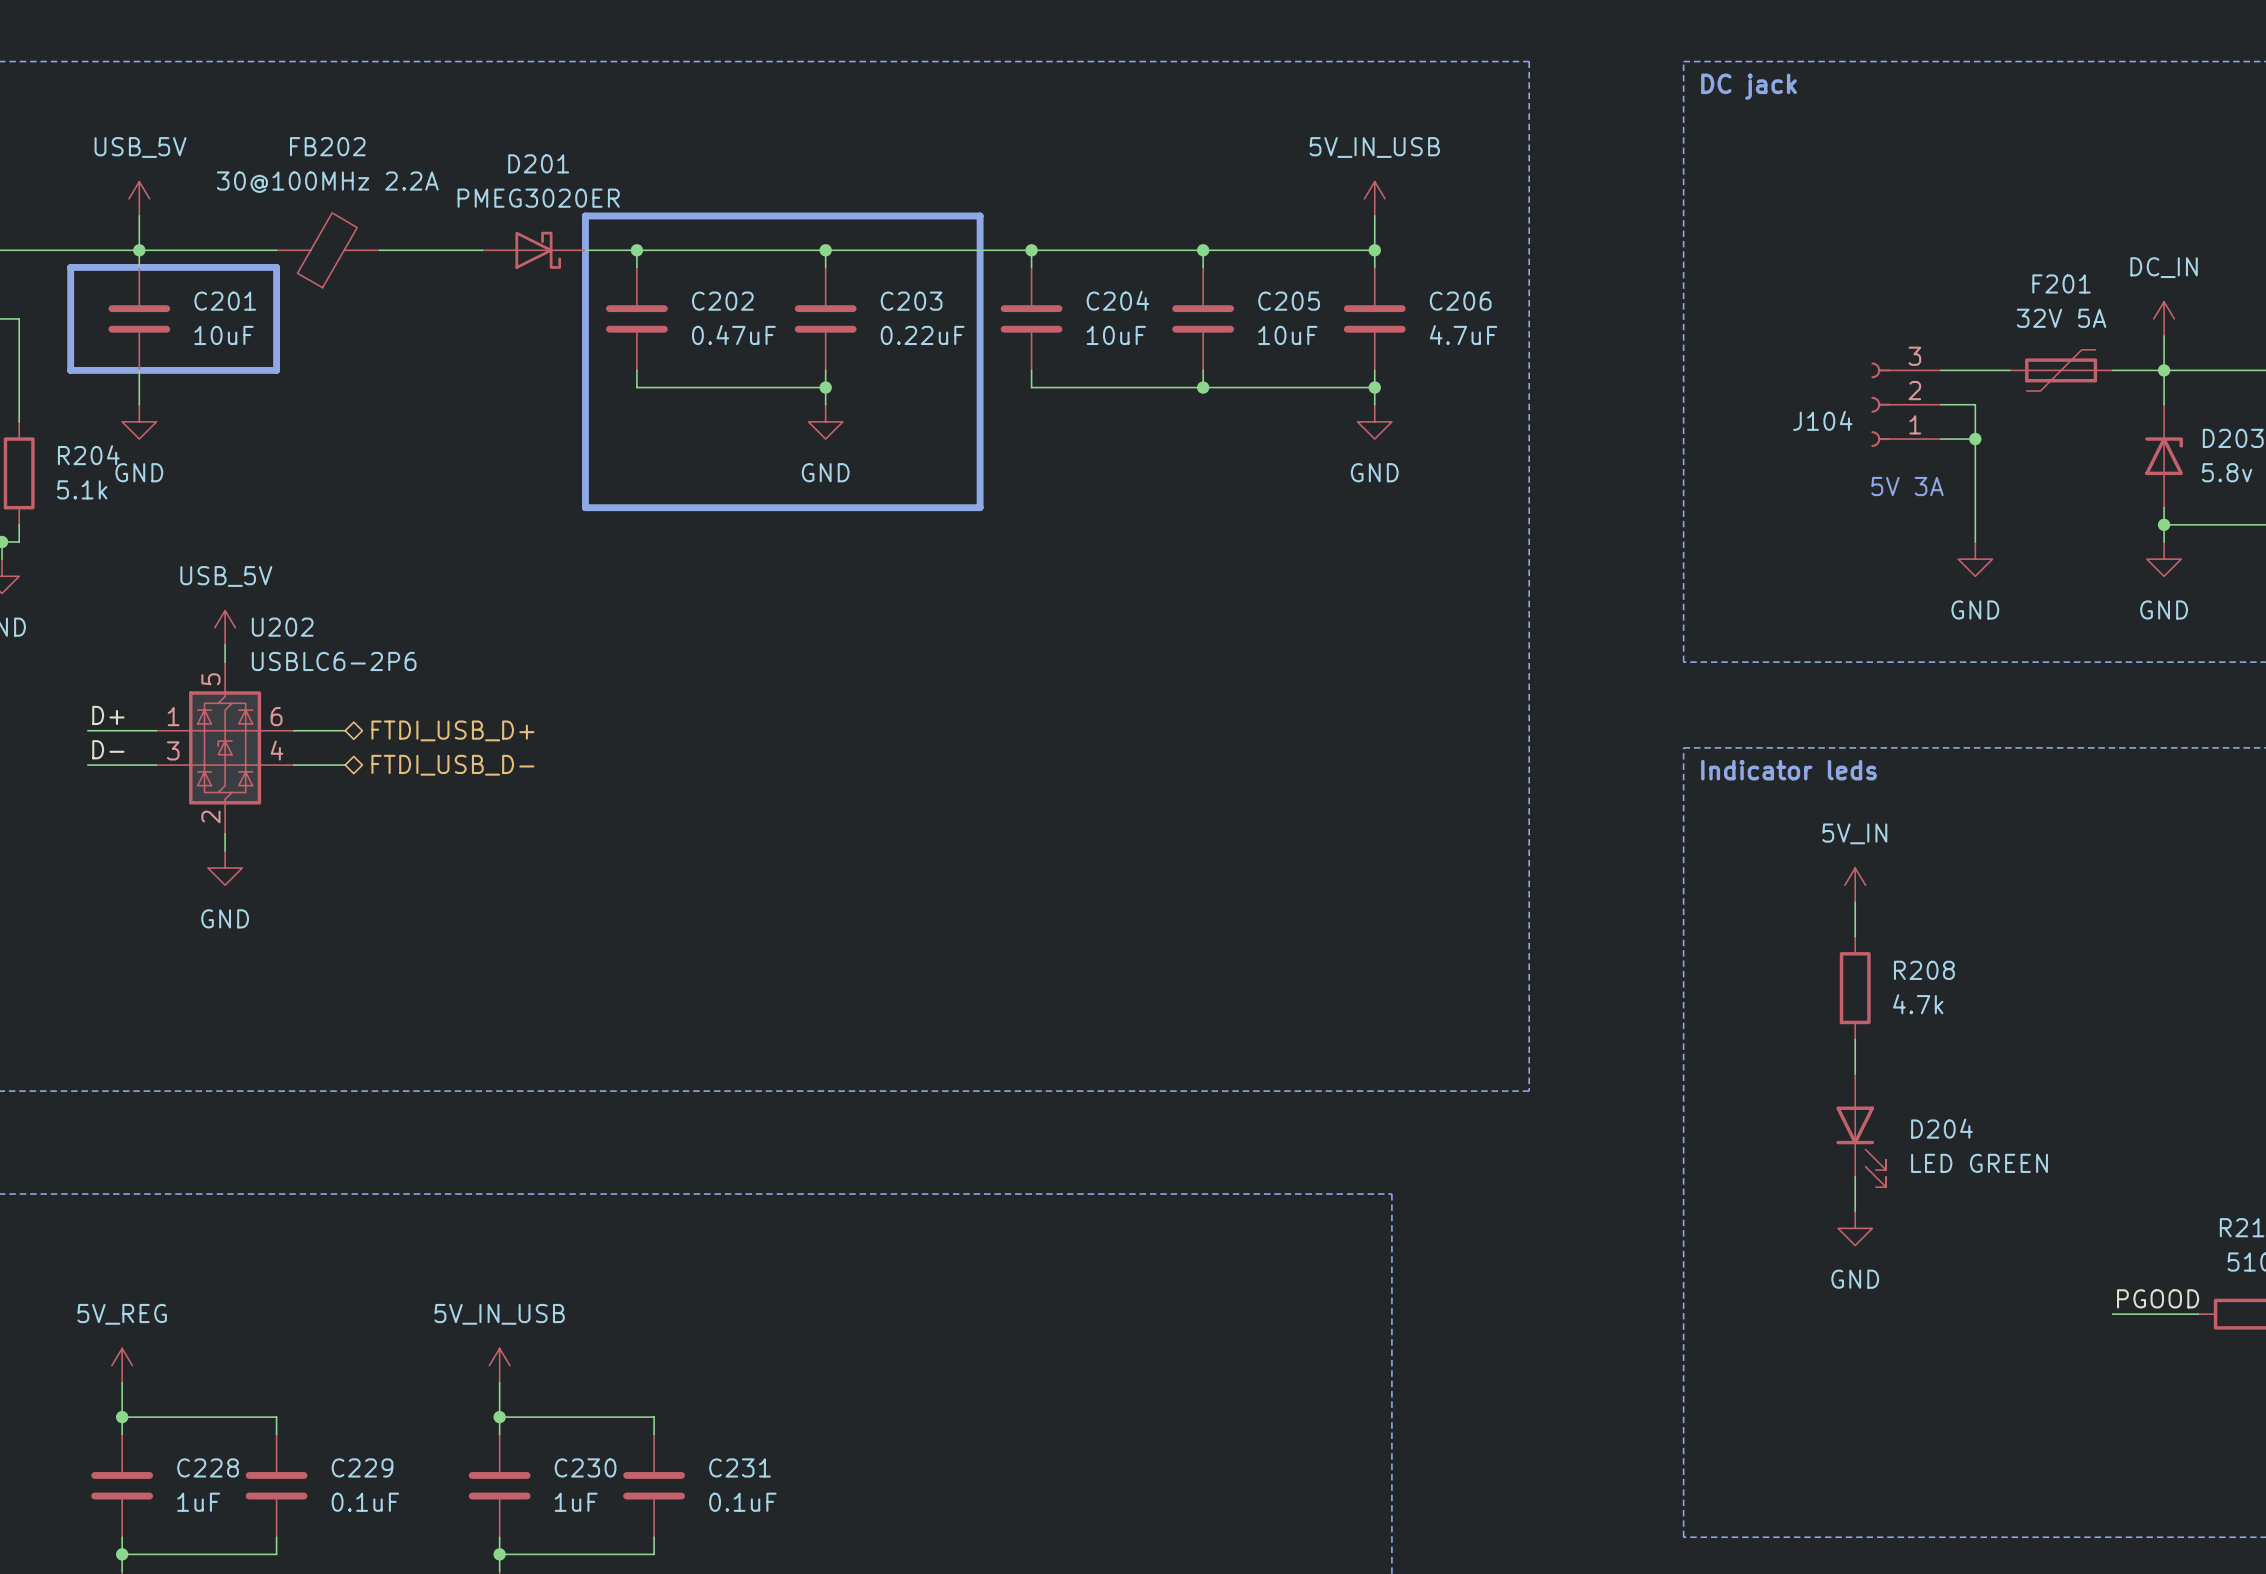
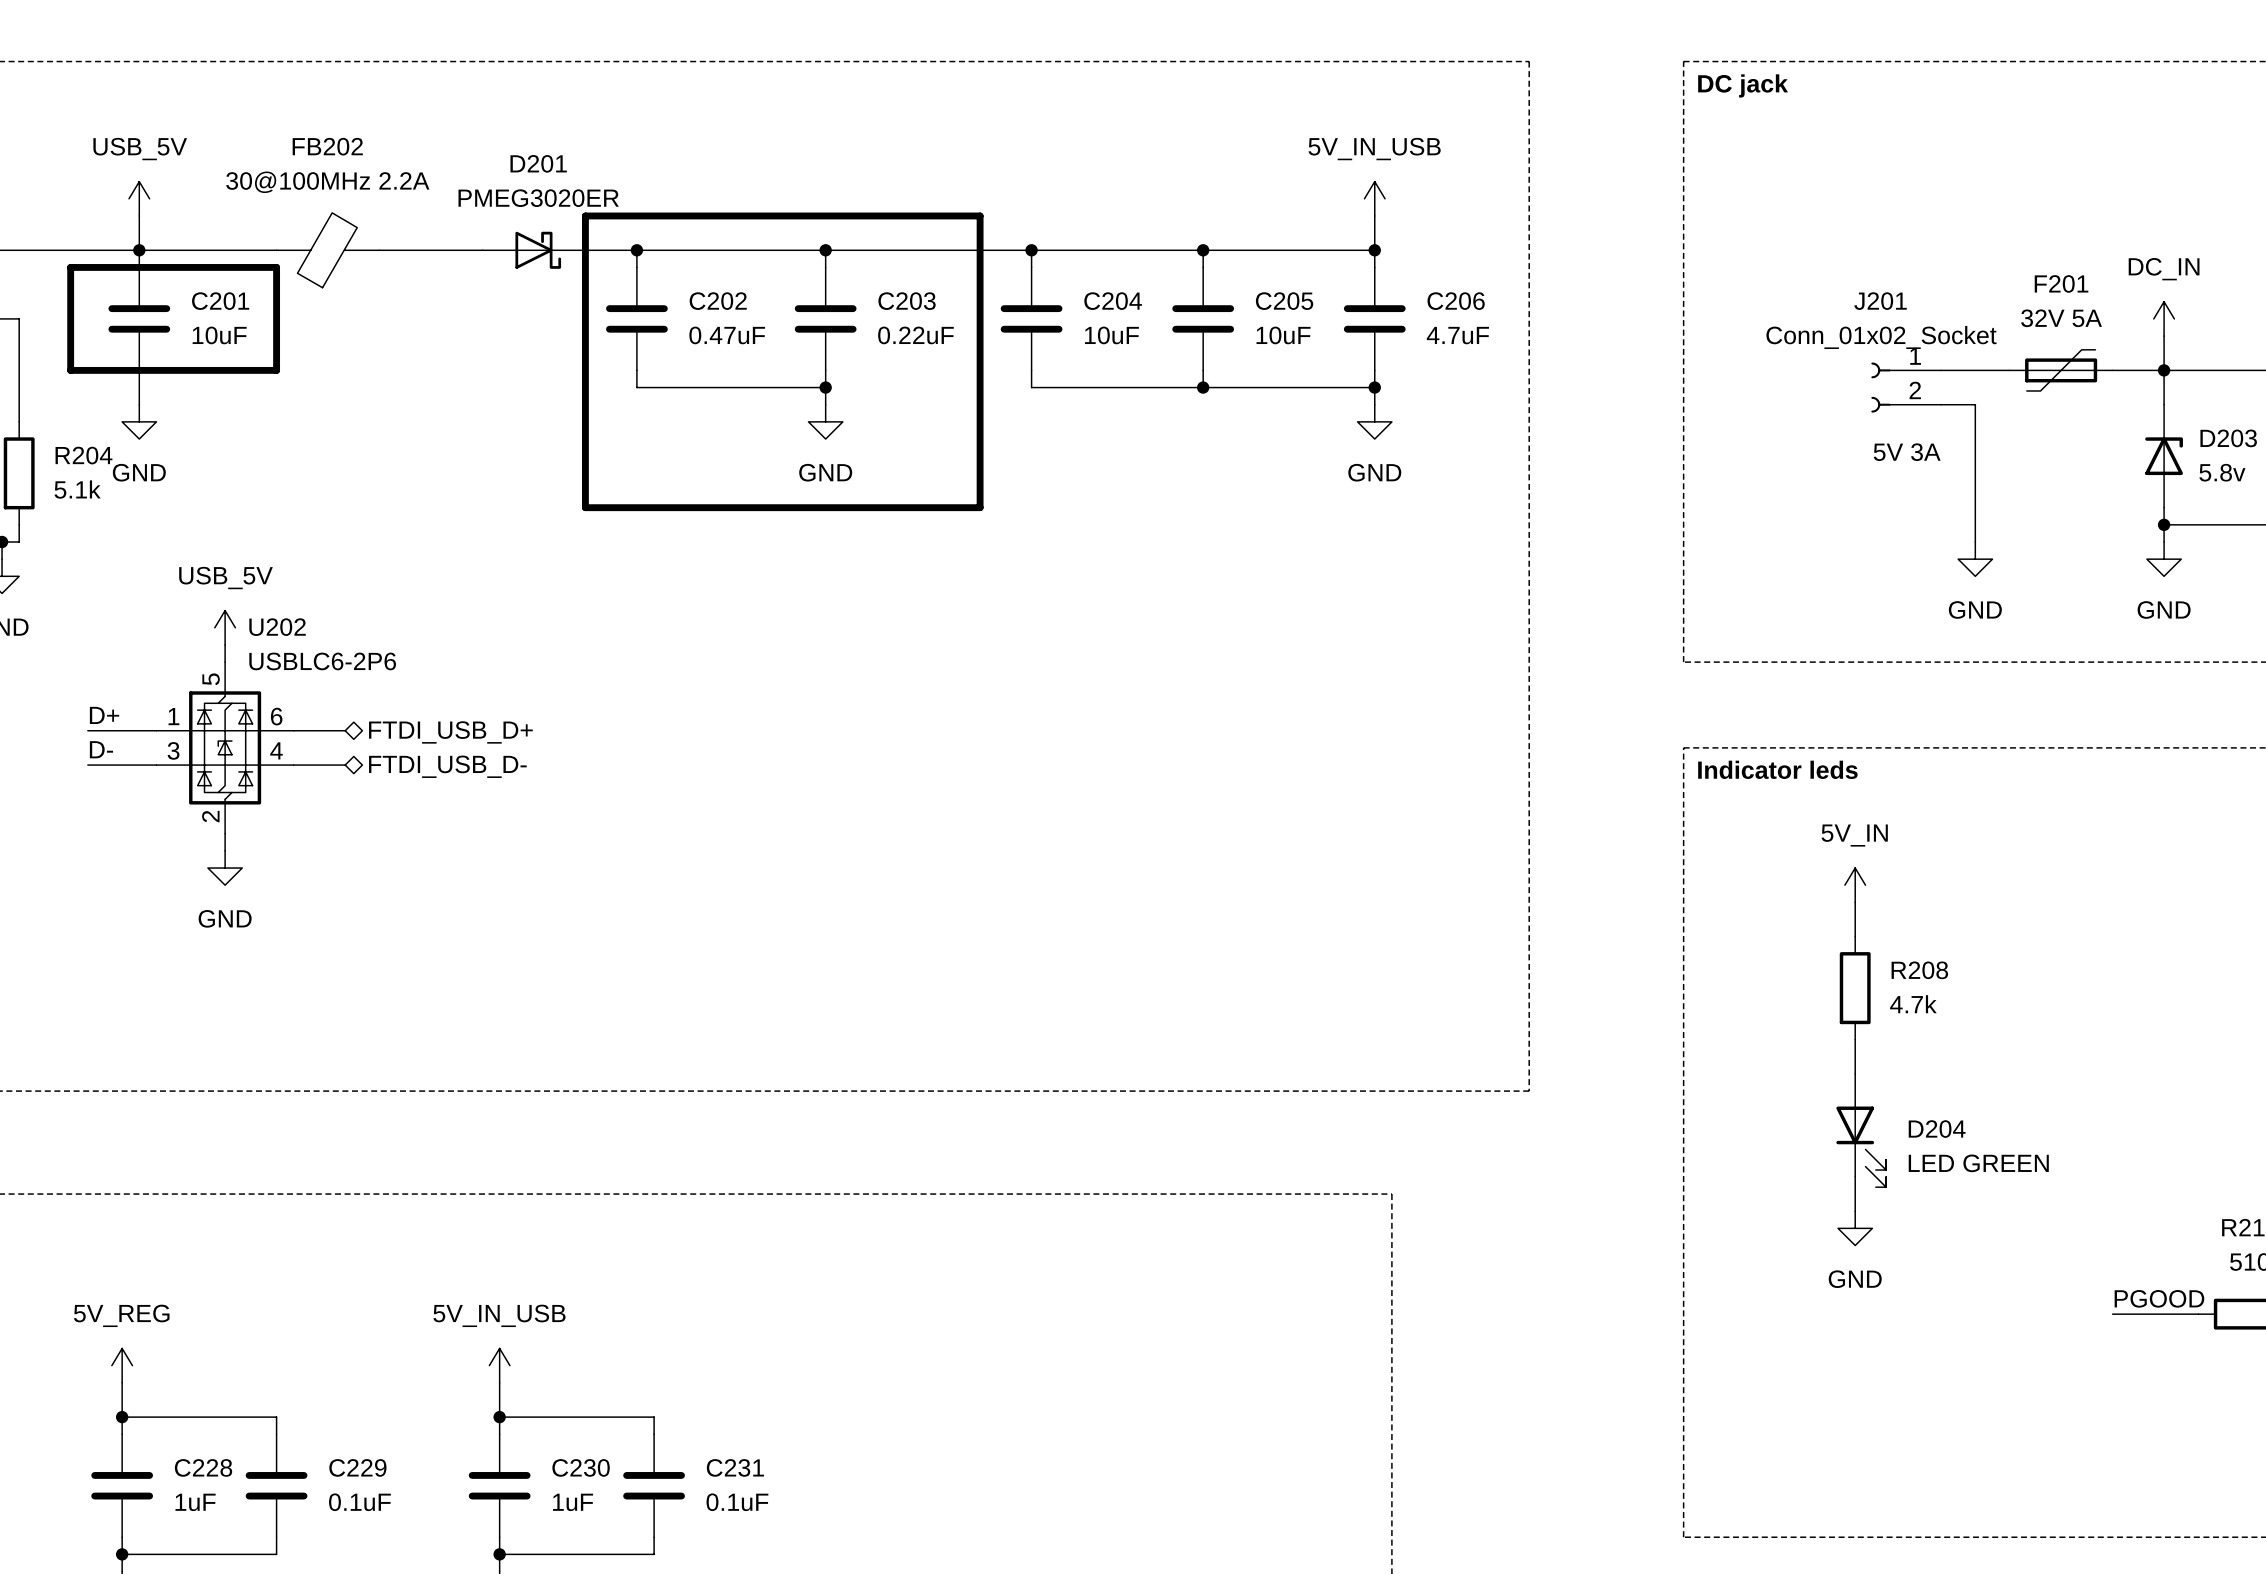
J201: none -> Conn_01x02_Socket (1906, 387)
J104: (1906, 404) -> none
wire: (1941, 439) (1975, 439) -> none
junction: (1975, 439) -> none
text position: 5V 3A (1907, 486) -> 5V 3A (1907, 452)

